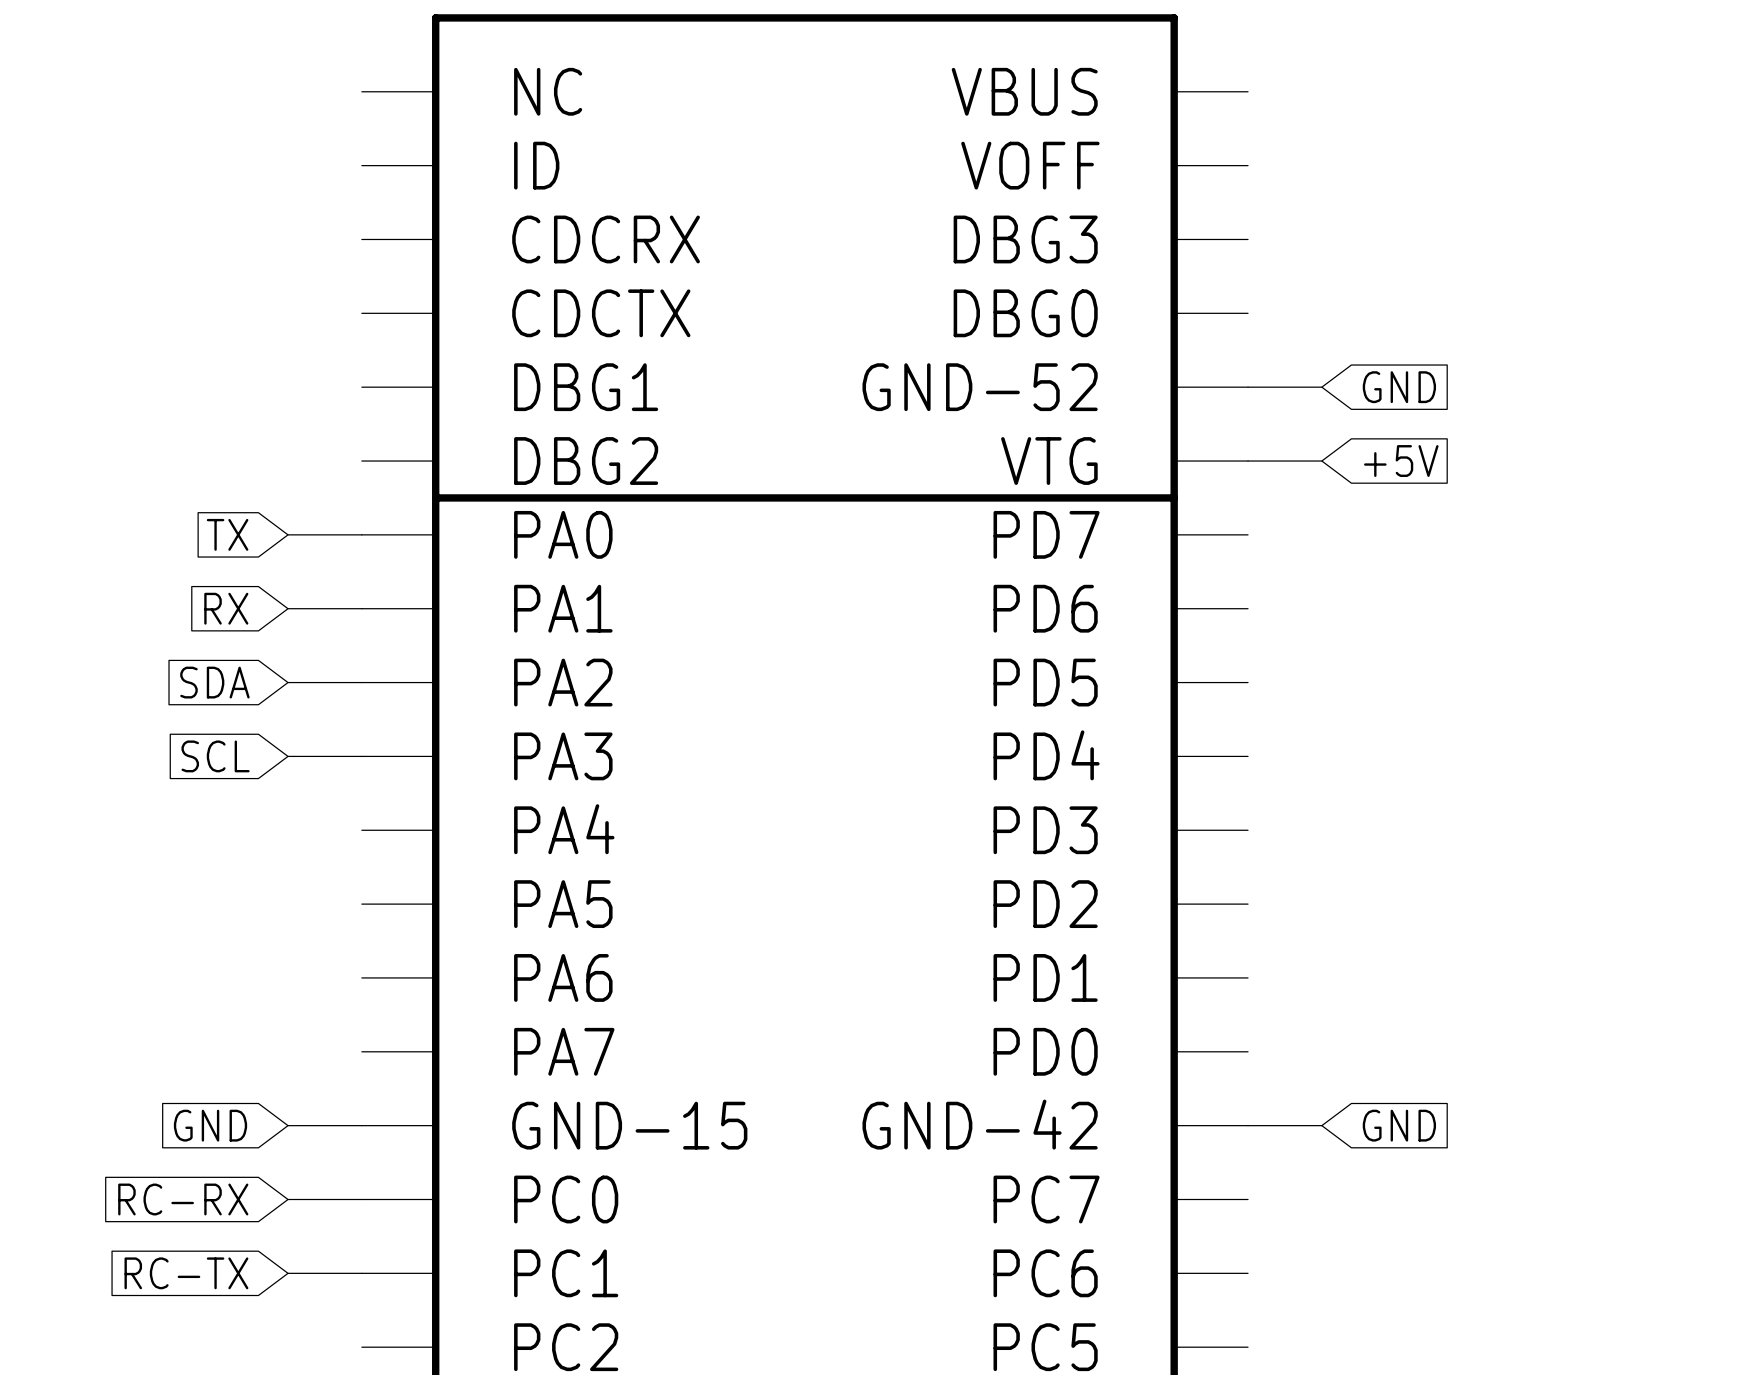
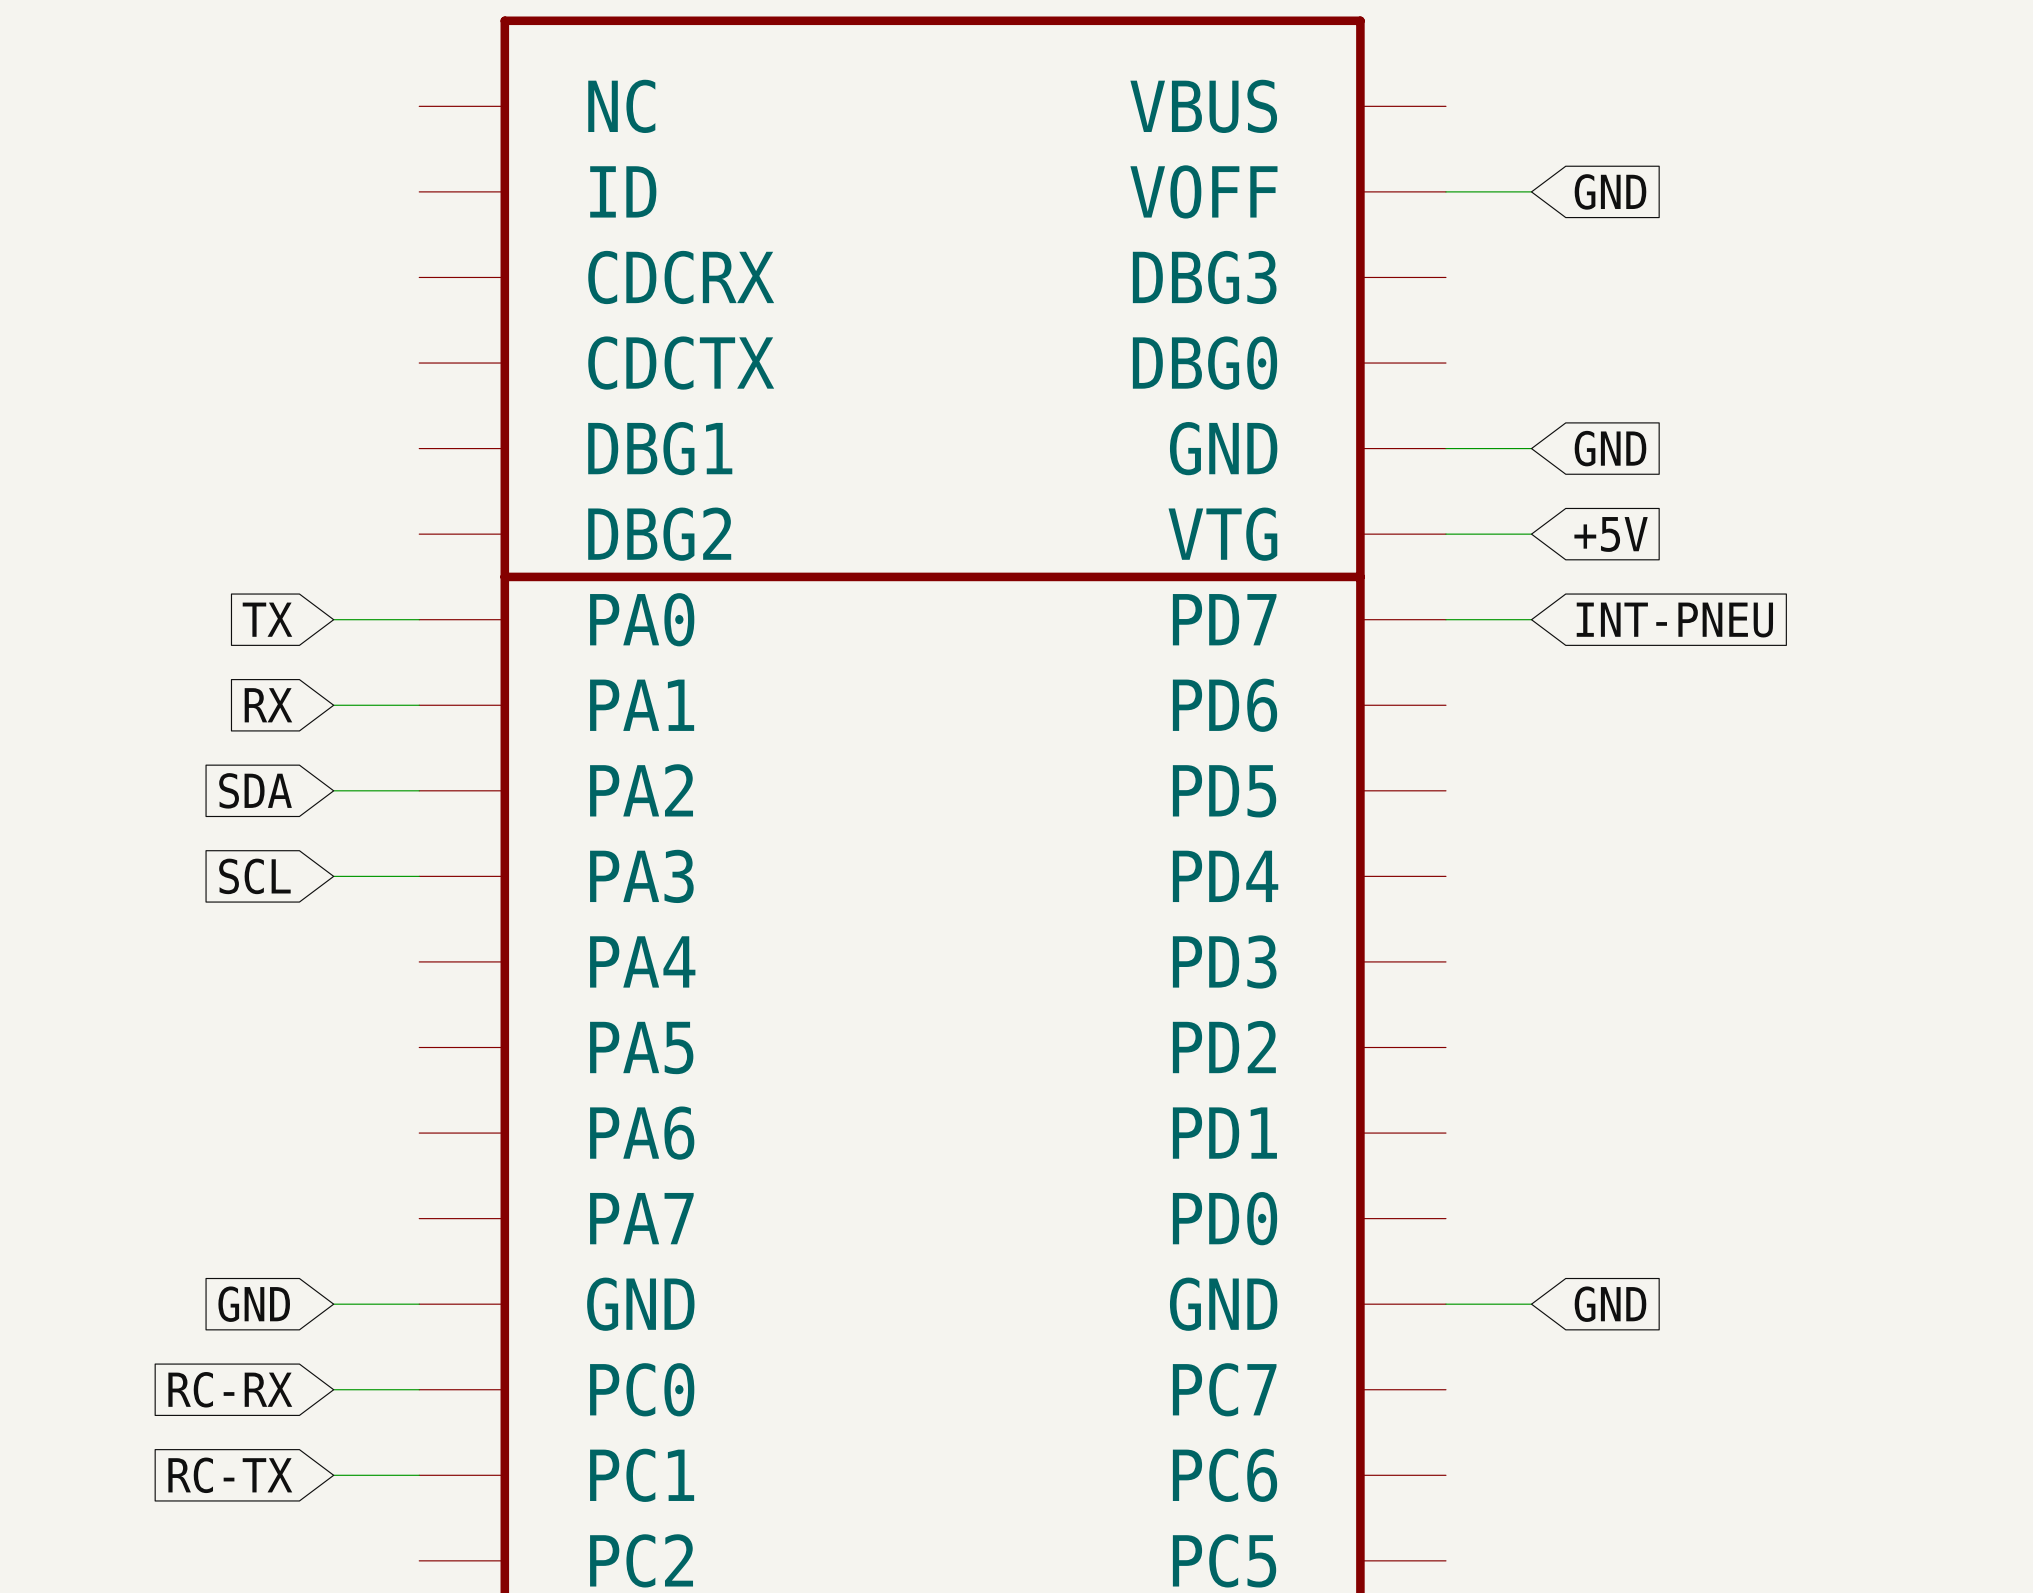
wire: none -> (1445, 191) (1531, 191)
global label: none -> GND (1610, 191)
part pin name: GND-52 (980, 387) -> GND (1223, 448)
wire: none -> (1445, 619) (1531, 619)
global label: none -> INT-PNEU (1674, 620)
part pin name: GND-42 (980, 1124) -> GND (1223, 1304)
part pin name: GND-15 (629, 1125) -> GND (640, 1304)

